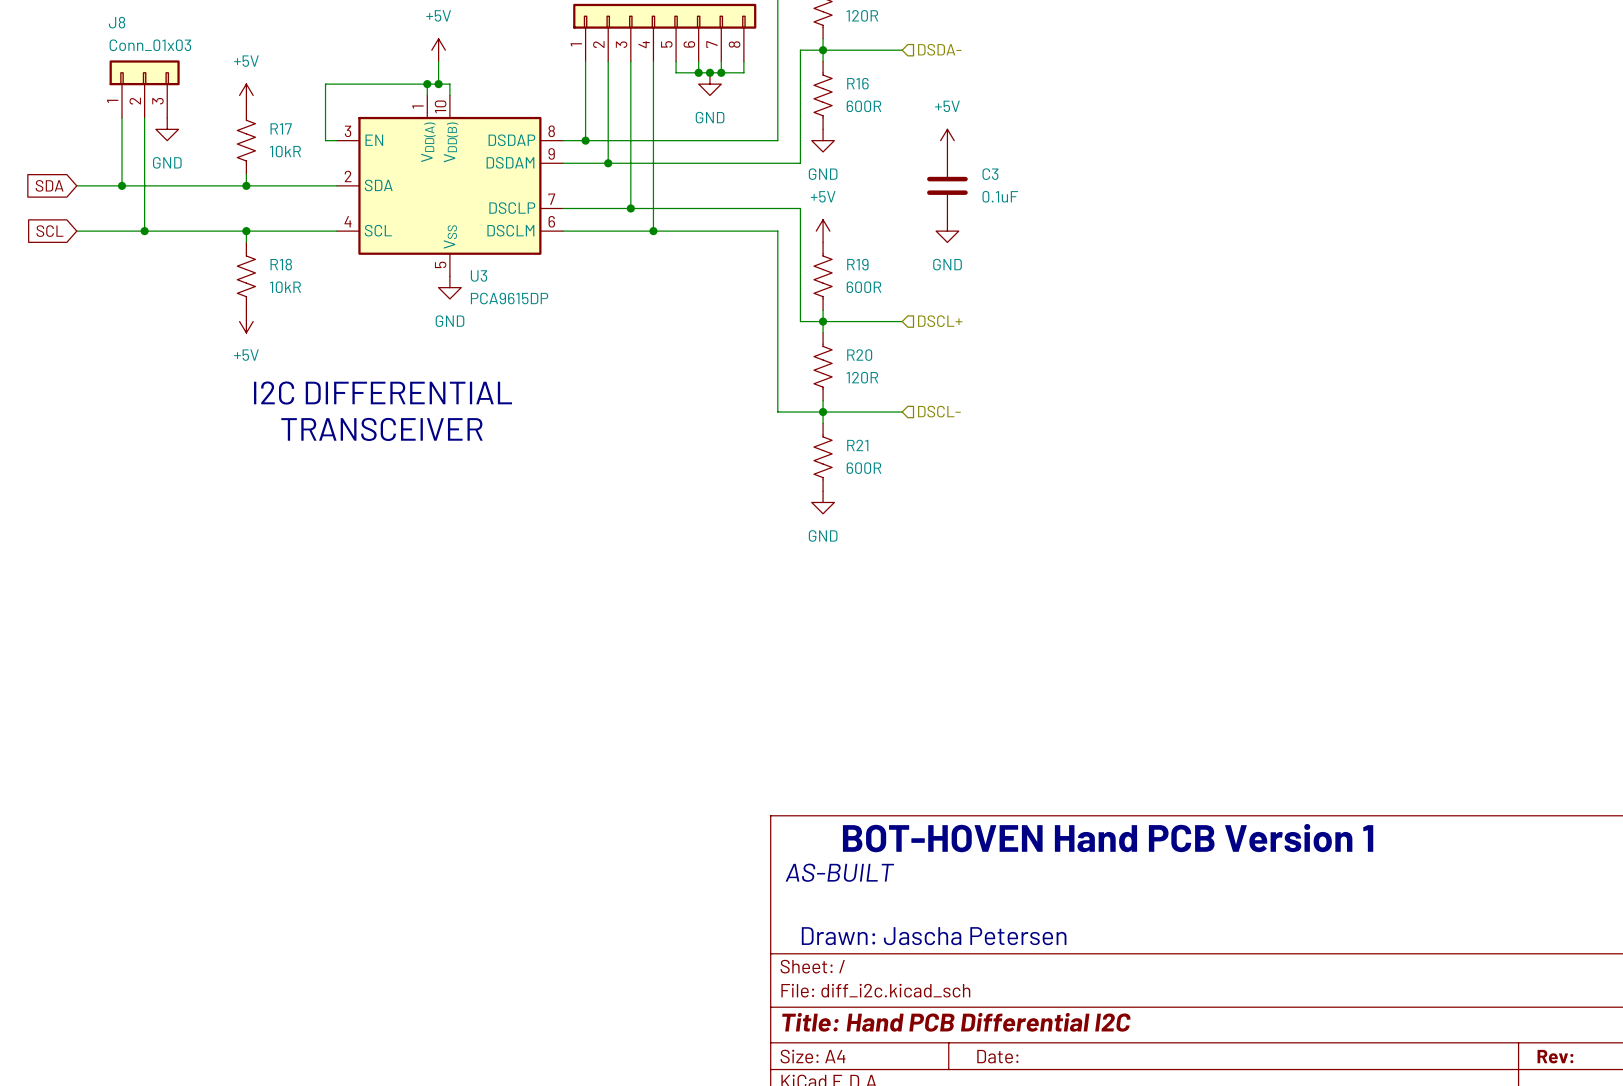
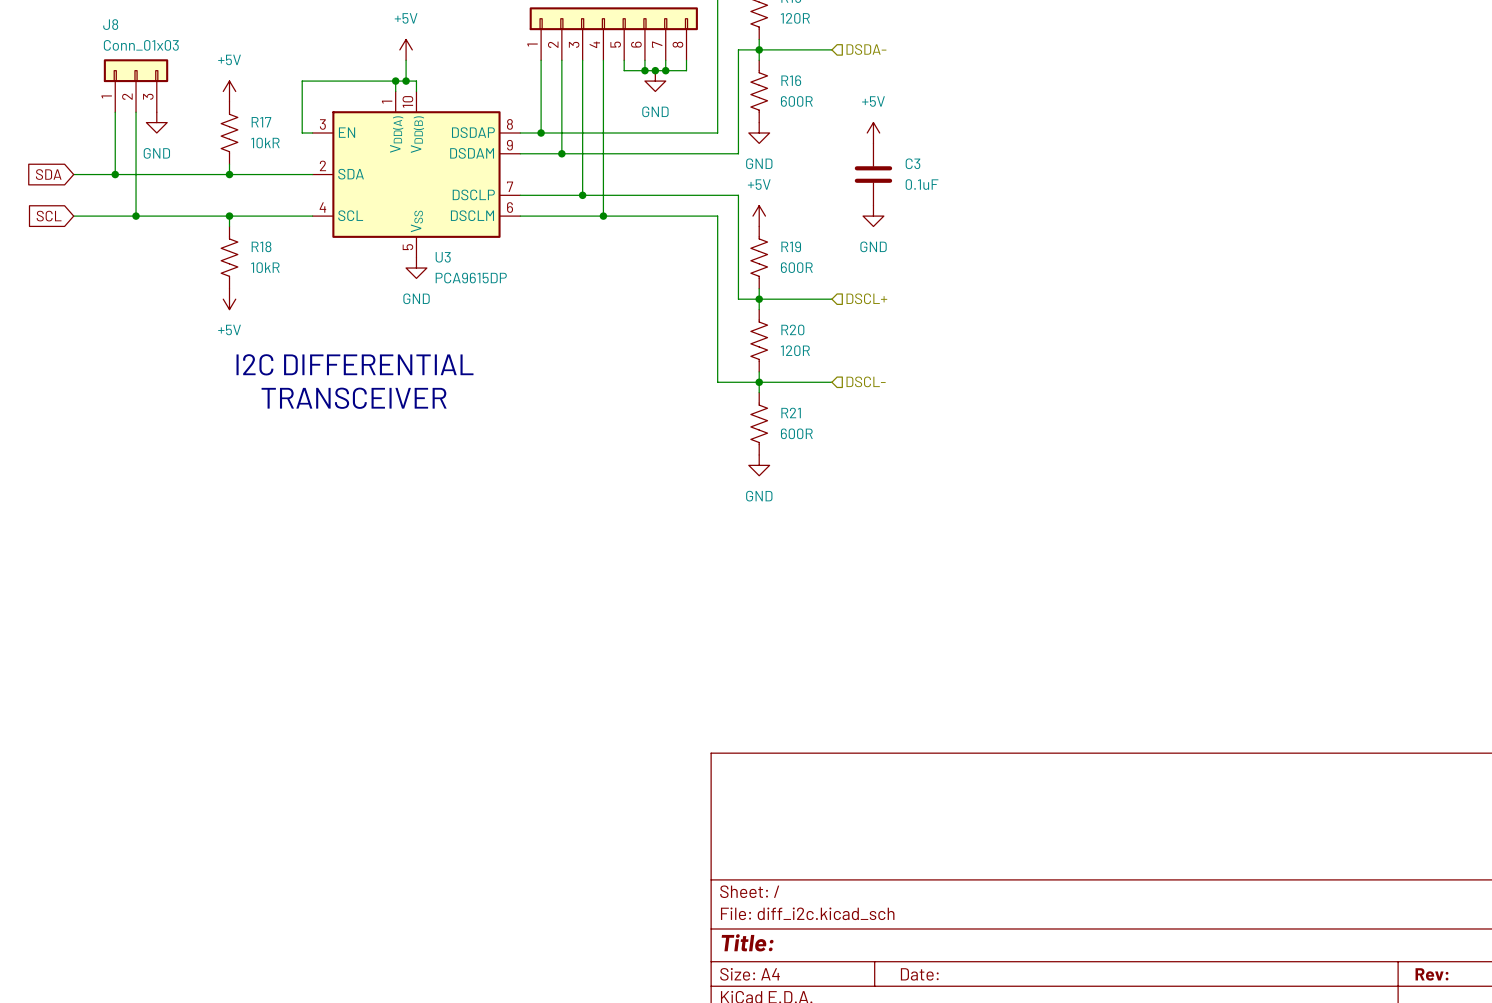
text: BOT-HOVEN Hand PCB Version 1 (1108, 838) -> none
text: AS-BUILT (839, 872) -> none
text: Drawn: Jascha Petersen (934, 936) -> none
title block: Title: Hand PCB Differential I2C (956, 1022) -> Title: (747, 942)

